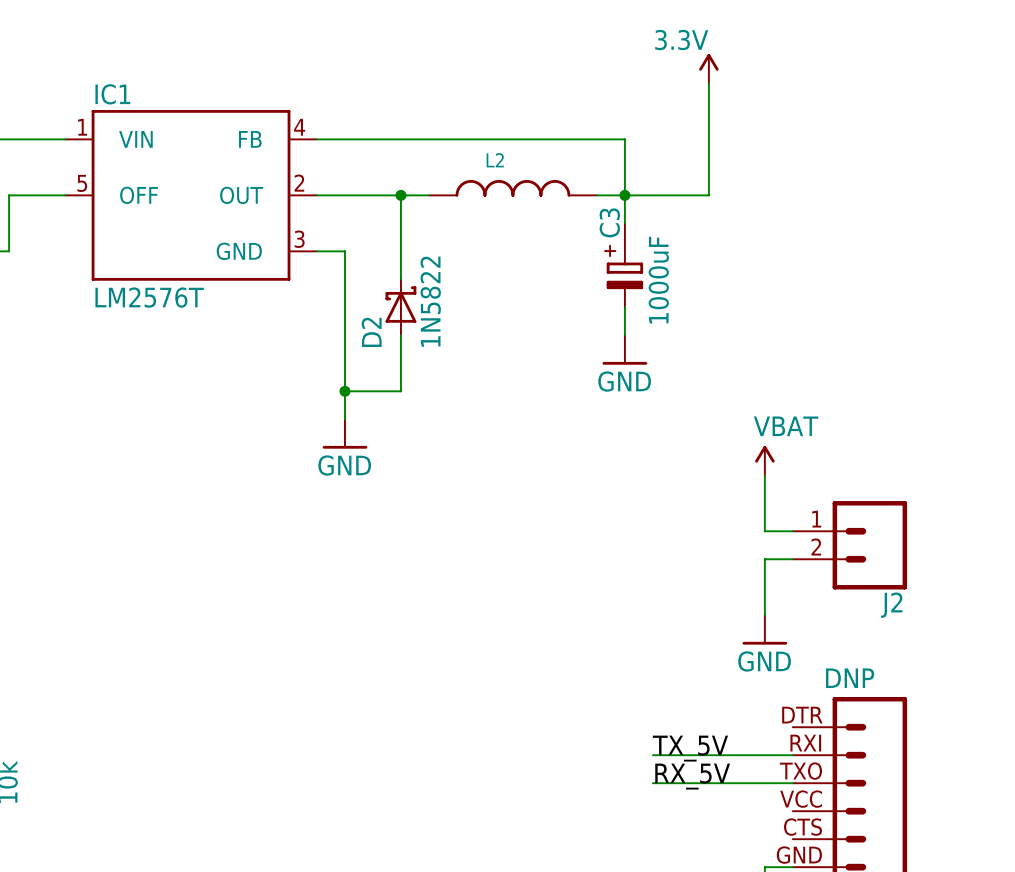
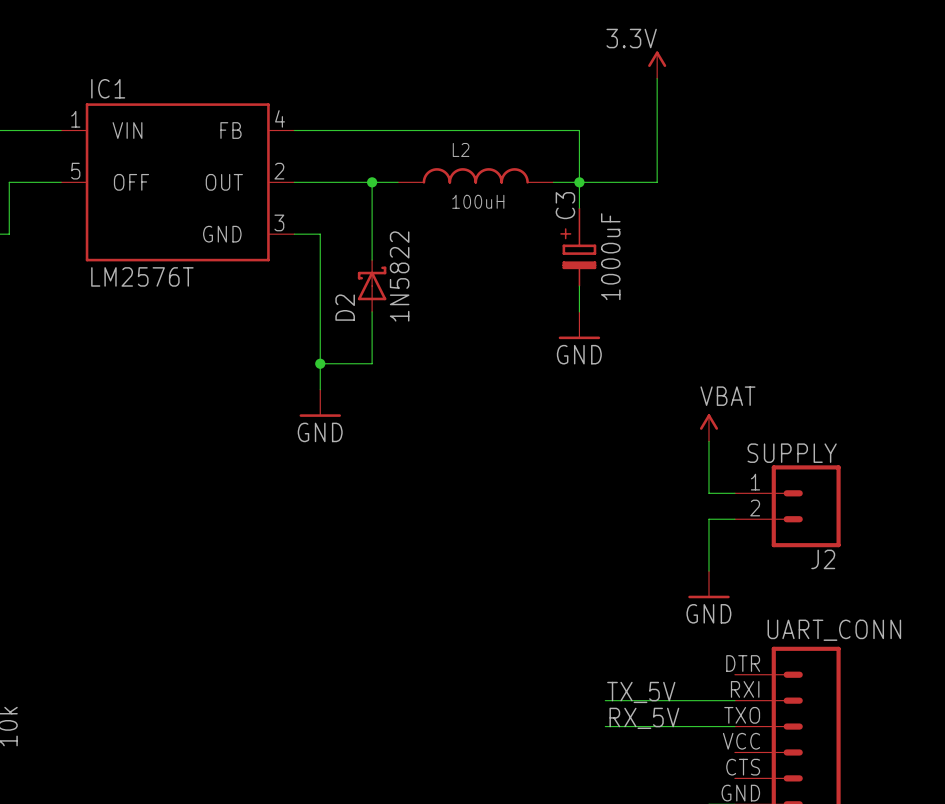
L2 value: none -> 100uH (478, 201)
J2 value: none -> SUPPLY (792, 453)
part value: DNP (850, 678) -> UART_CONN (834, 630)

